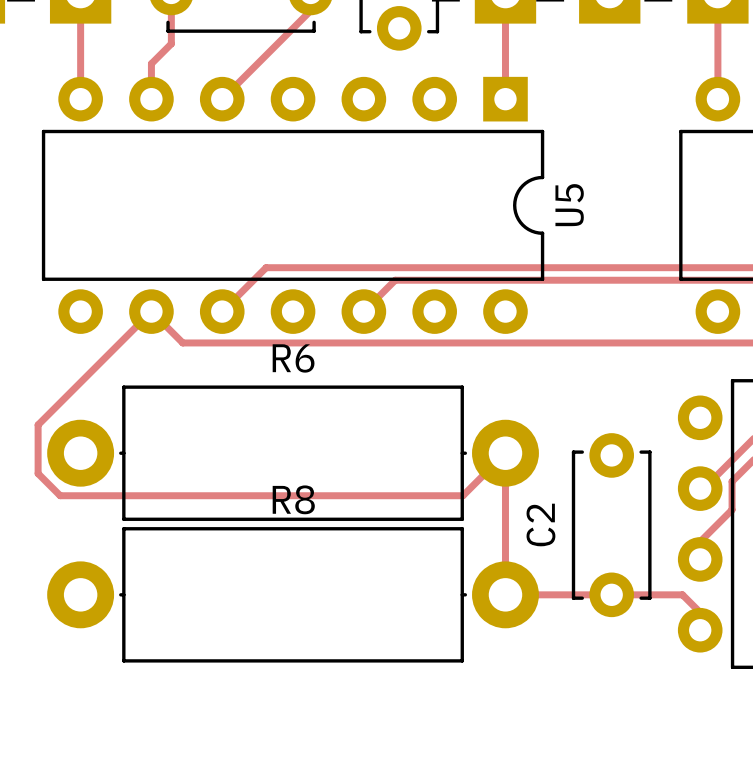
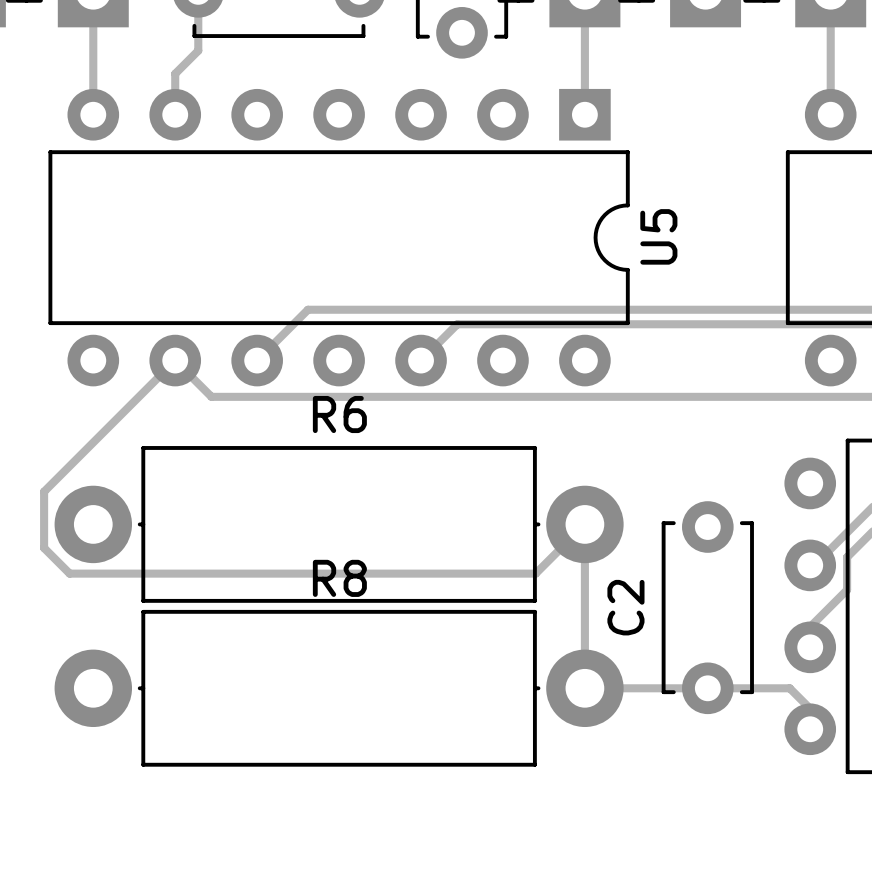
track: (310, 10) (222, 99) -> none

